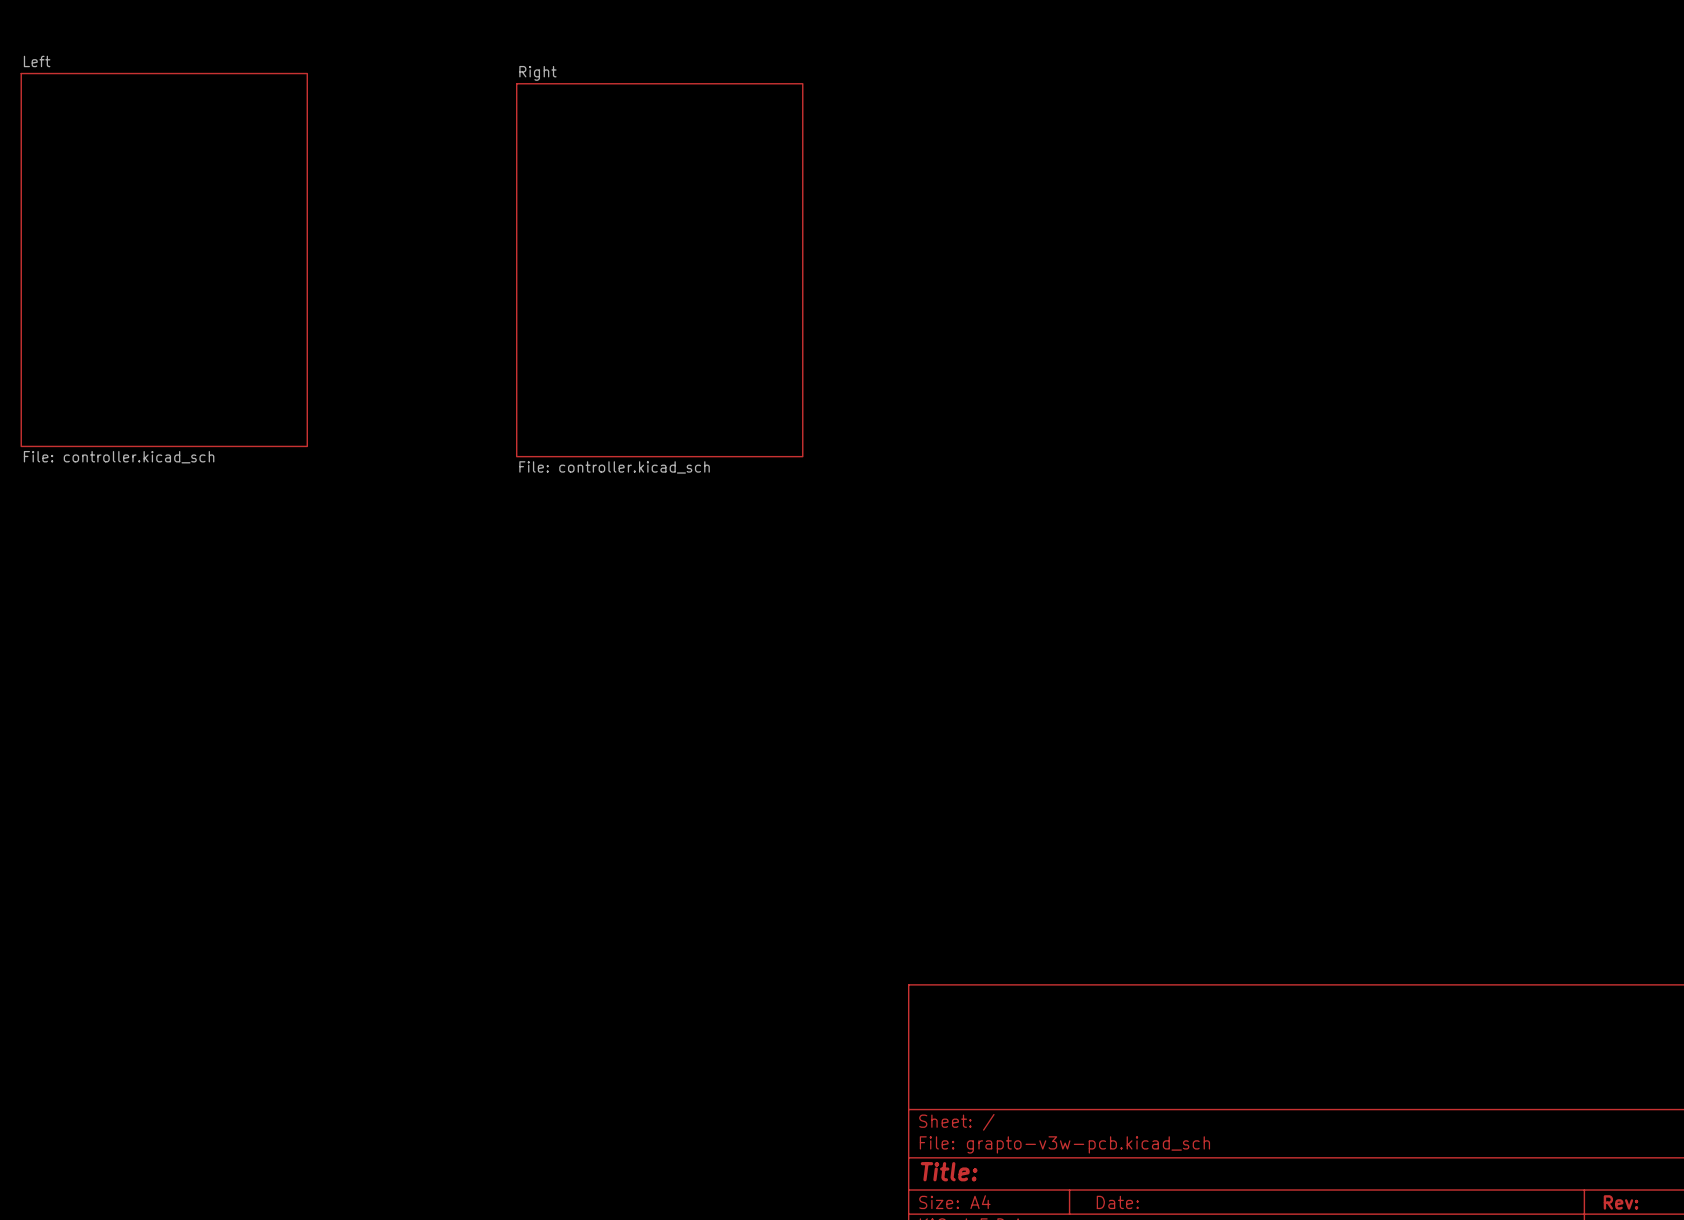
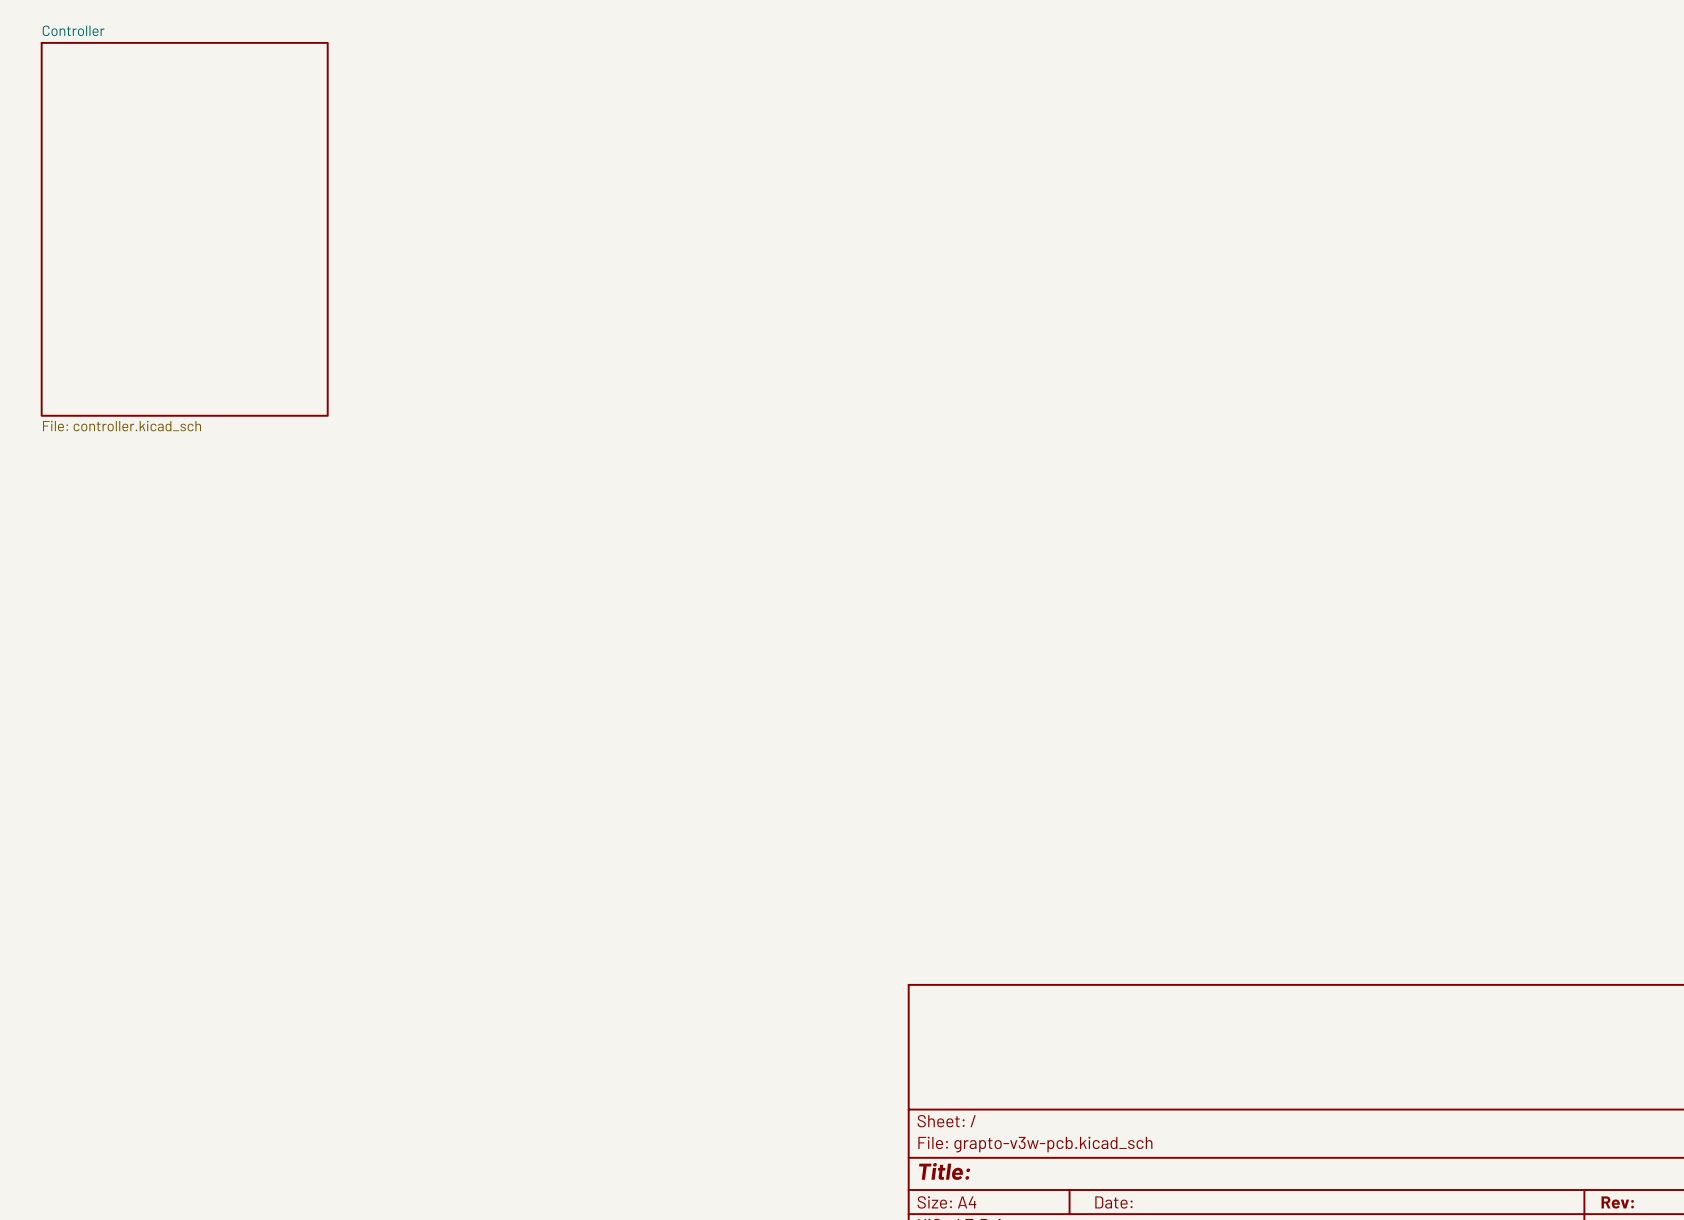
sheet Controller: none -> File: controller.kicad_sch (184, 229)
sheet Left: File: controller.kicad_sch (164, 259) -> none
sheet Right: File: controller.kicad_sch (659, 270) -> none

